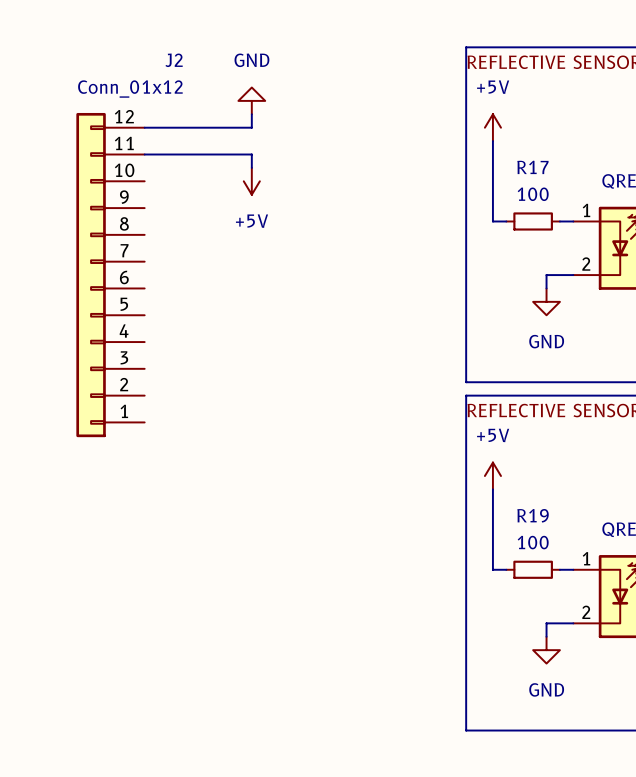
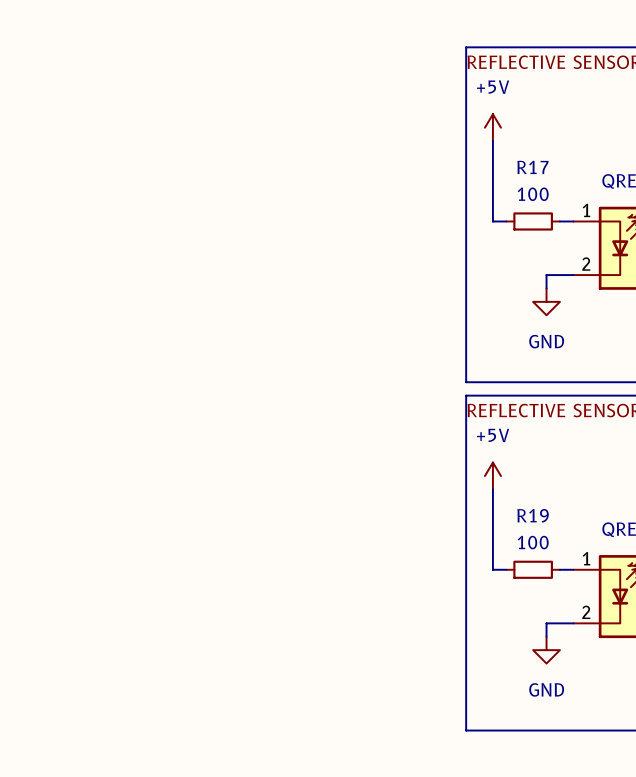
power symbol: GND (251, 100) -> none
wire: (251, 114) (251, 127) (144, 127) -> none
wire: (144, 154) (251, 154) (251, 167) -> none
power symbol: +5V (251, 181) -> none
J2: Conn_01x12 (110, 275) -> none

